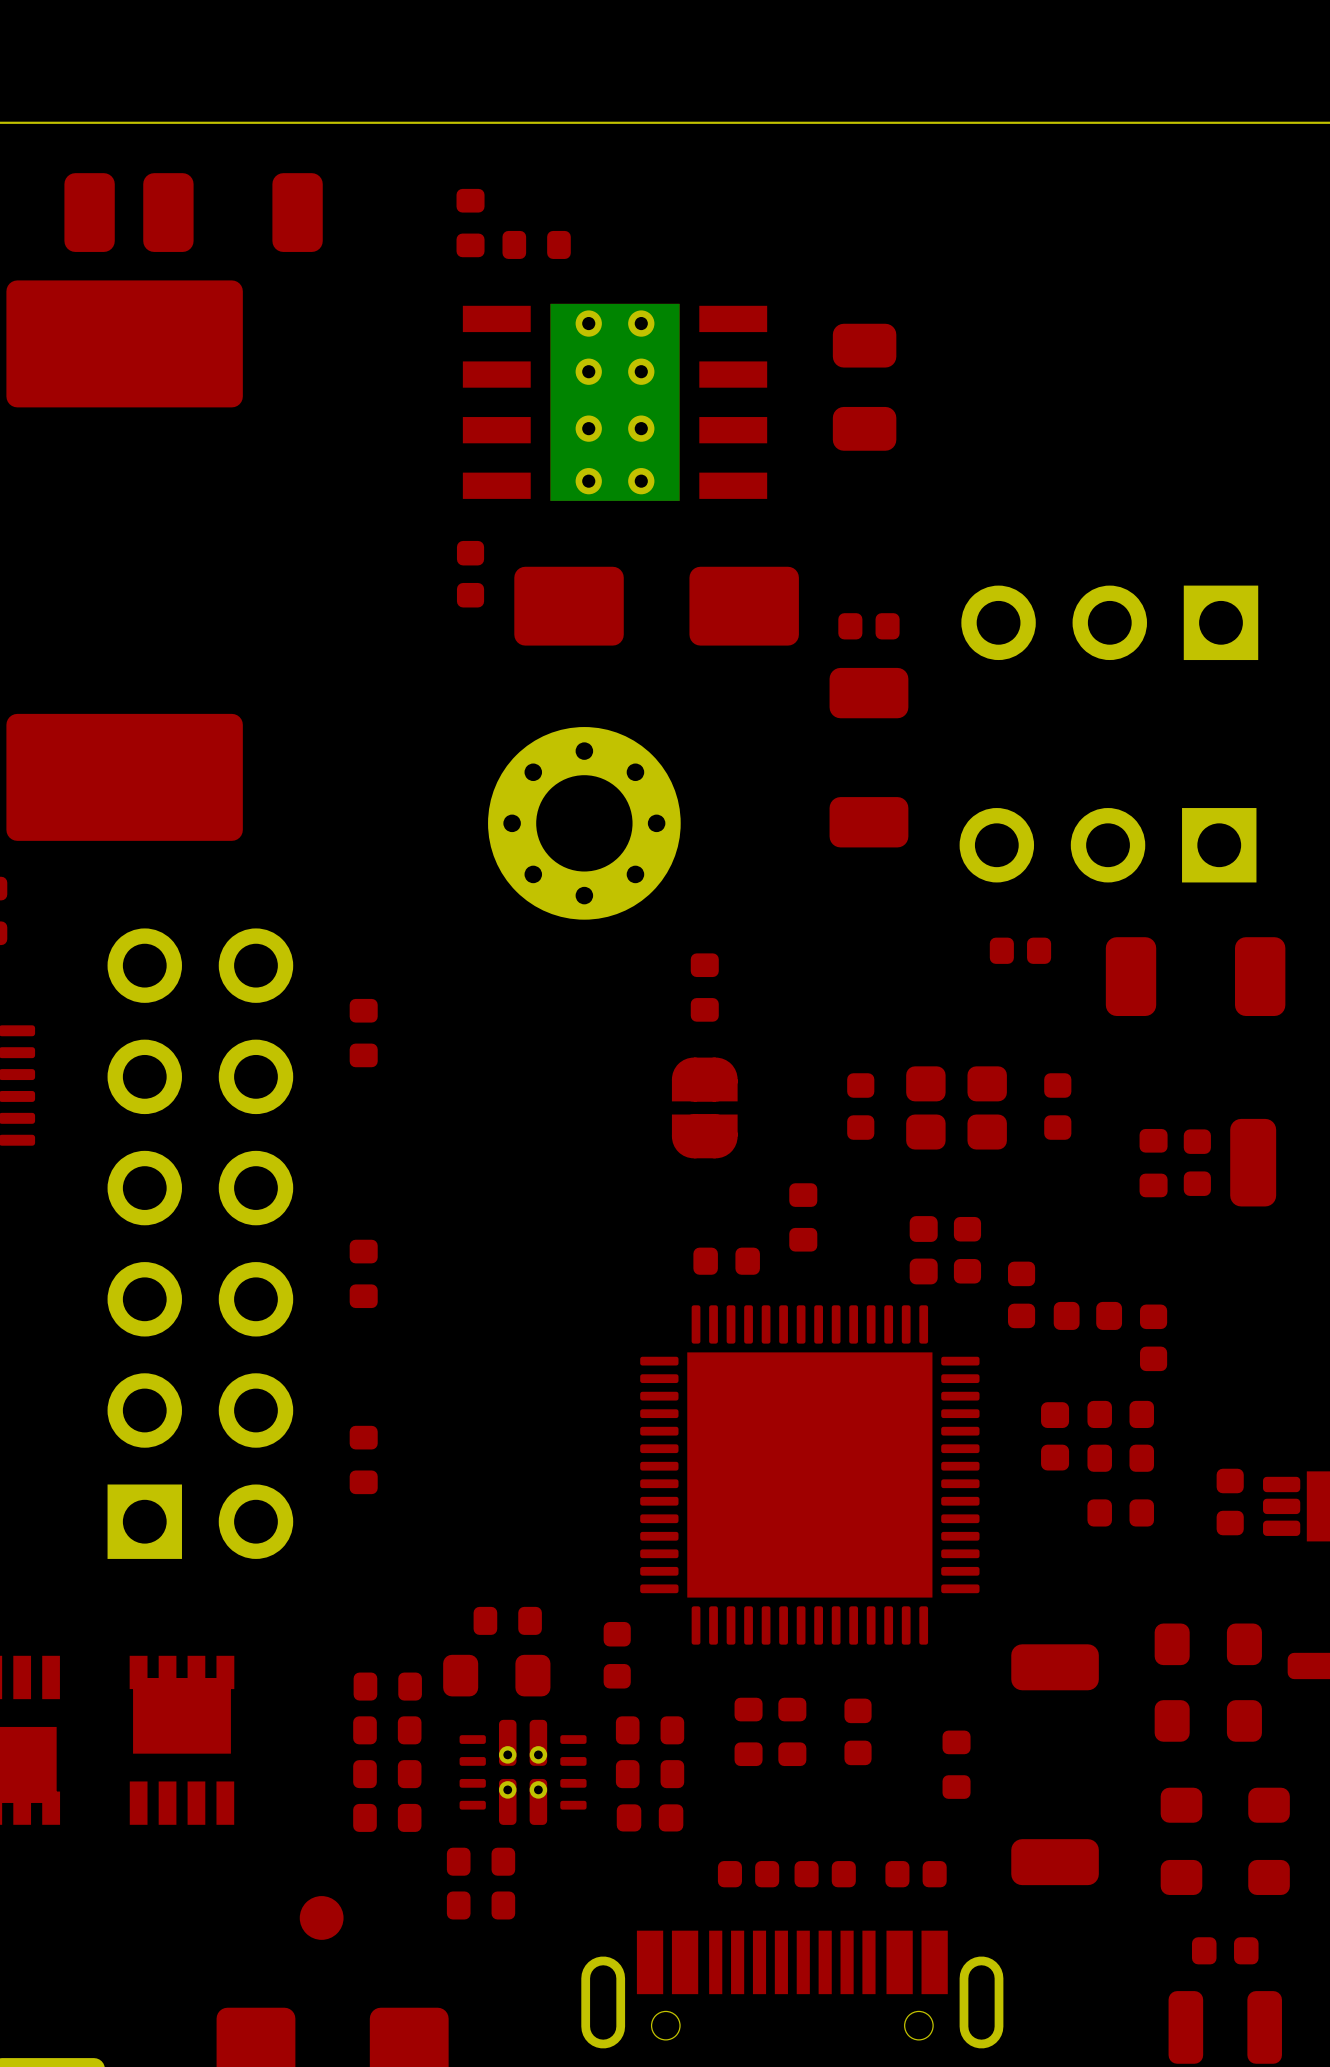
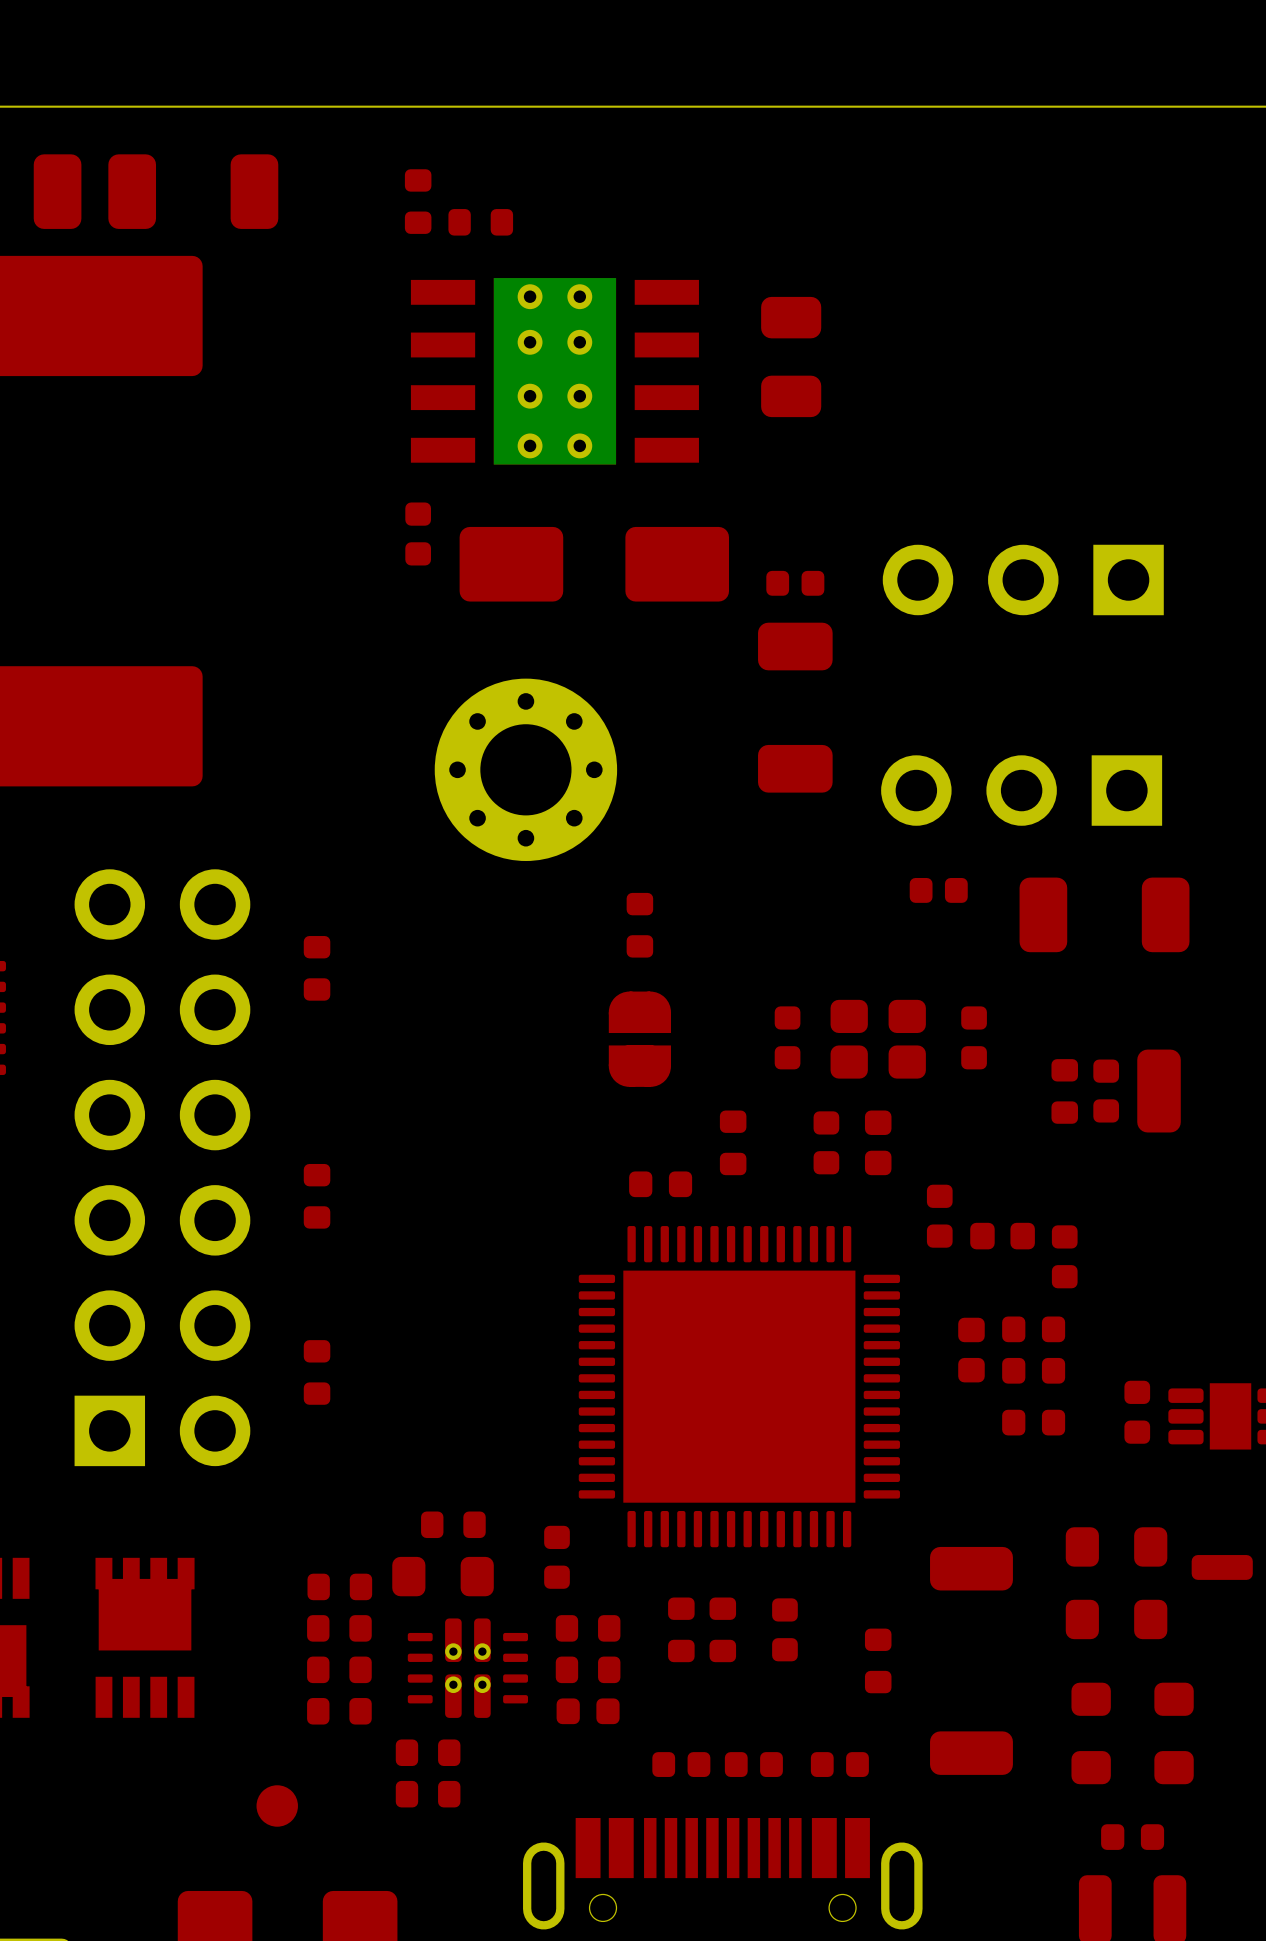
part position: (923, 1250) -> (878, 1142)
part position: (967, 1250) -> (826, 1142)

